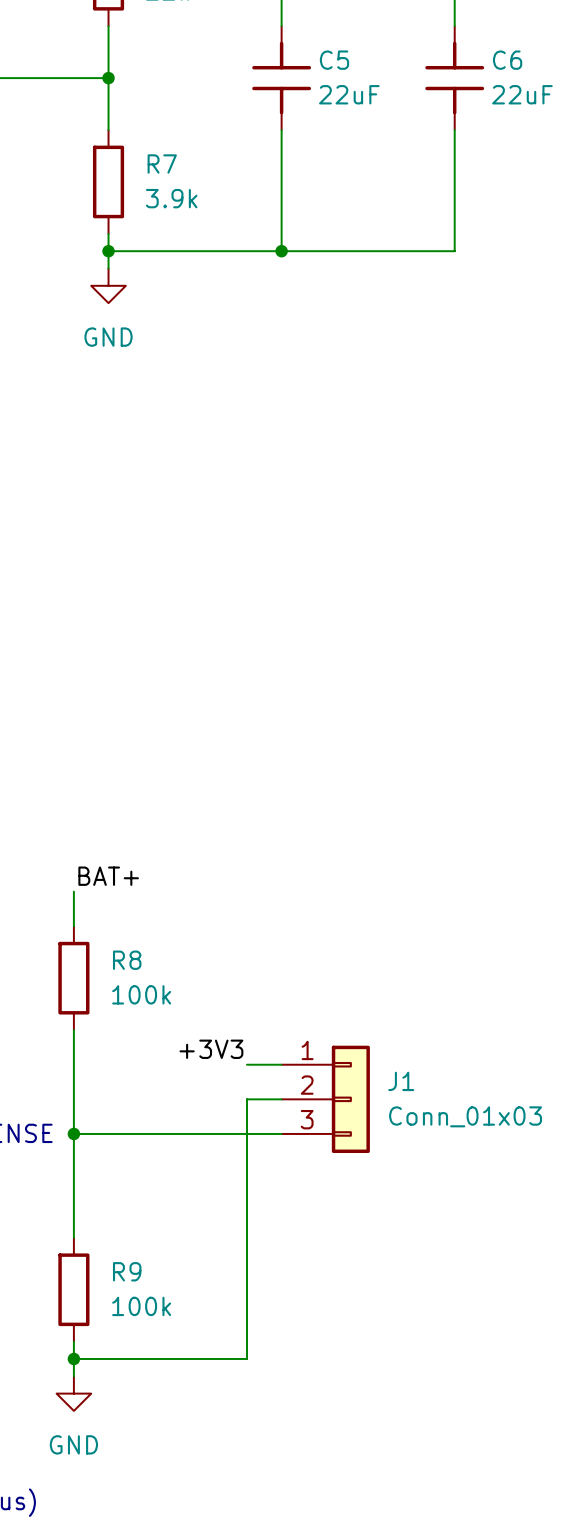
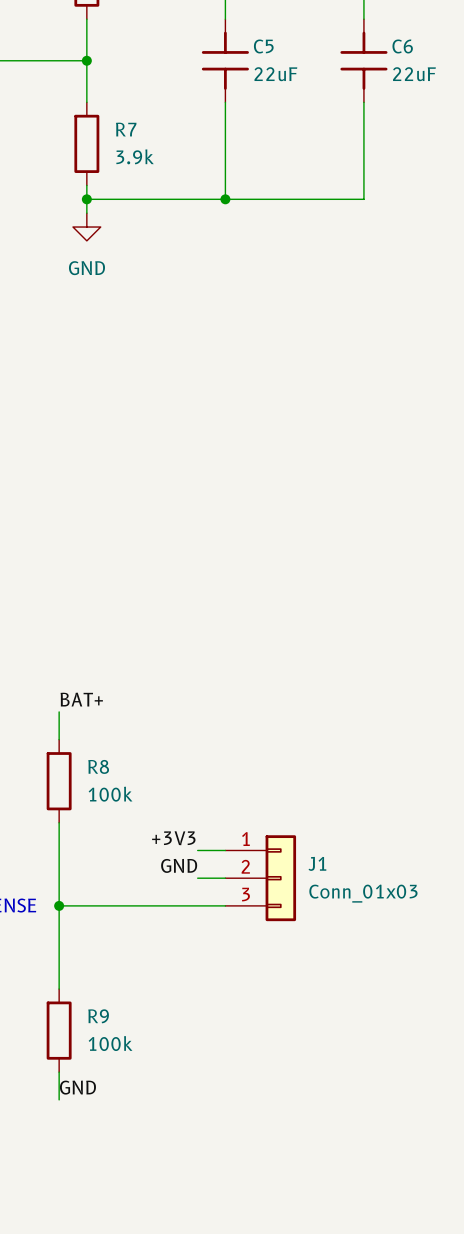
label: none -> GND (179, 865)
wire: (247, 1099) (247, 1358) (73, 1358) -> none
junction: (73, 1358) -> none
label: none -> GND (77, 1087)
power symbol: GND (73, 1393) -> none

